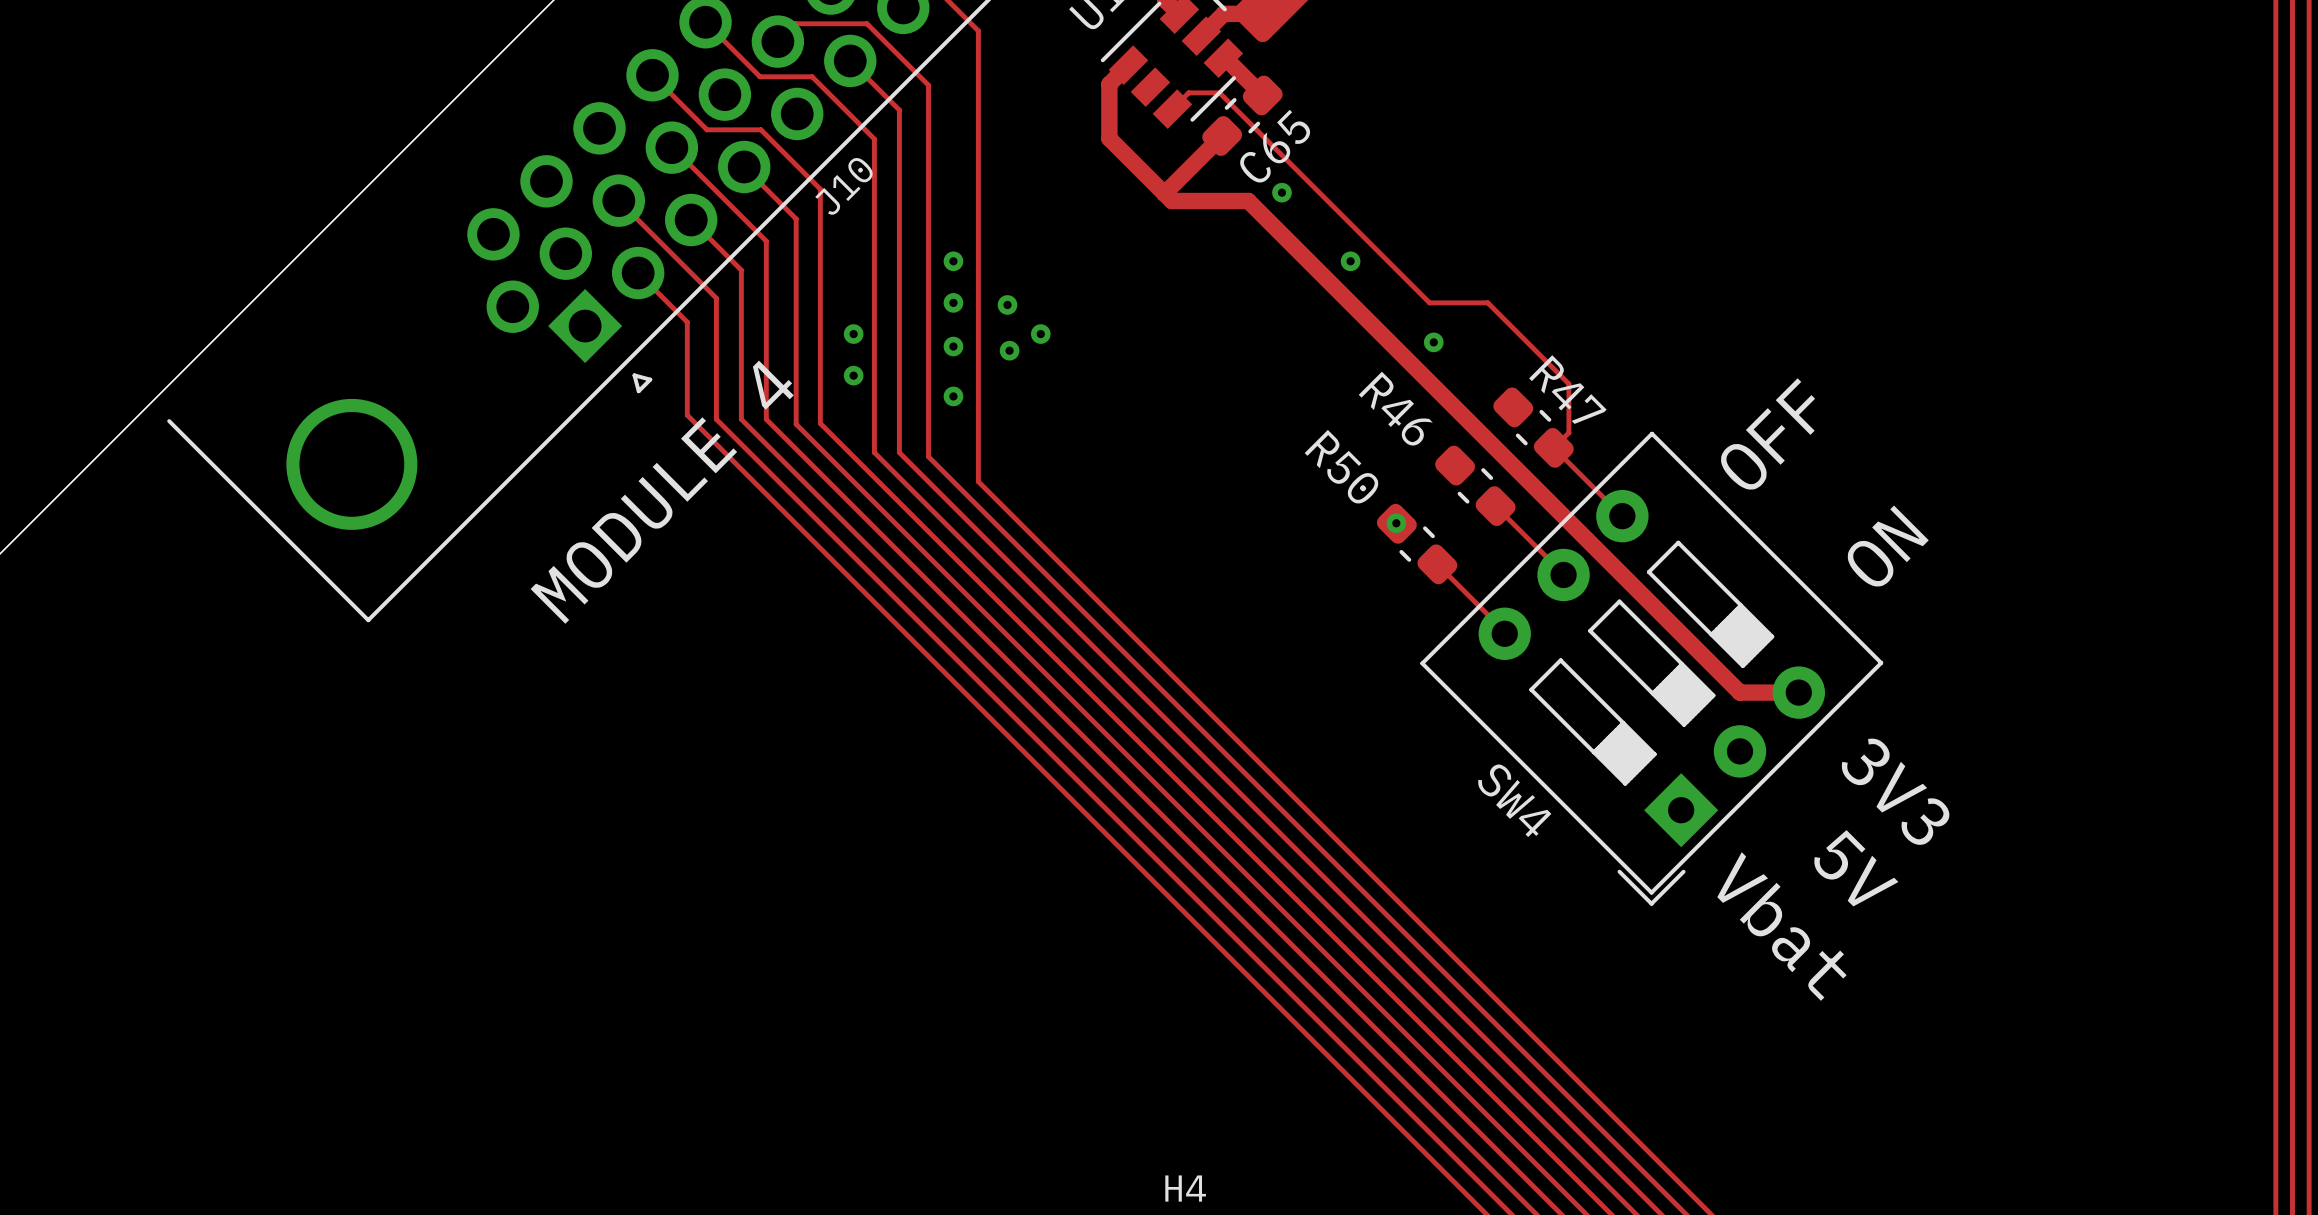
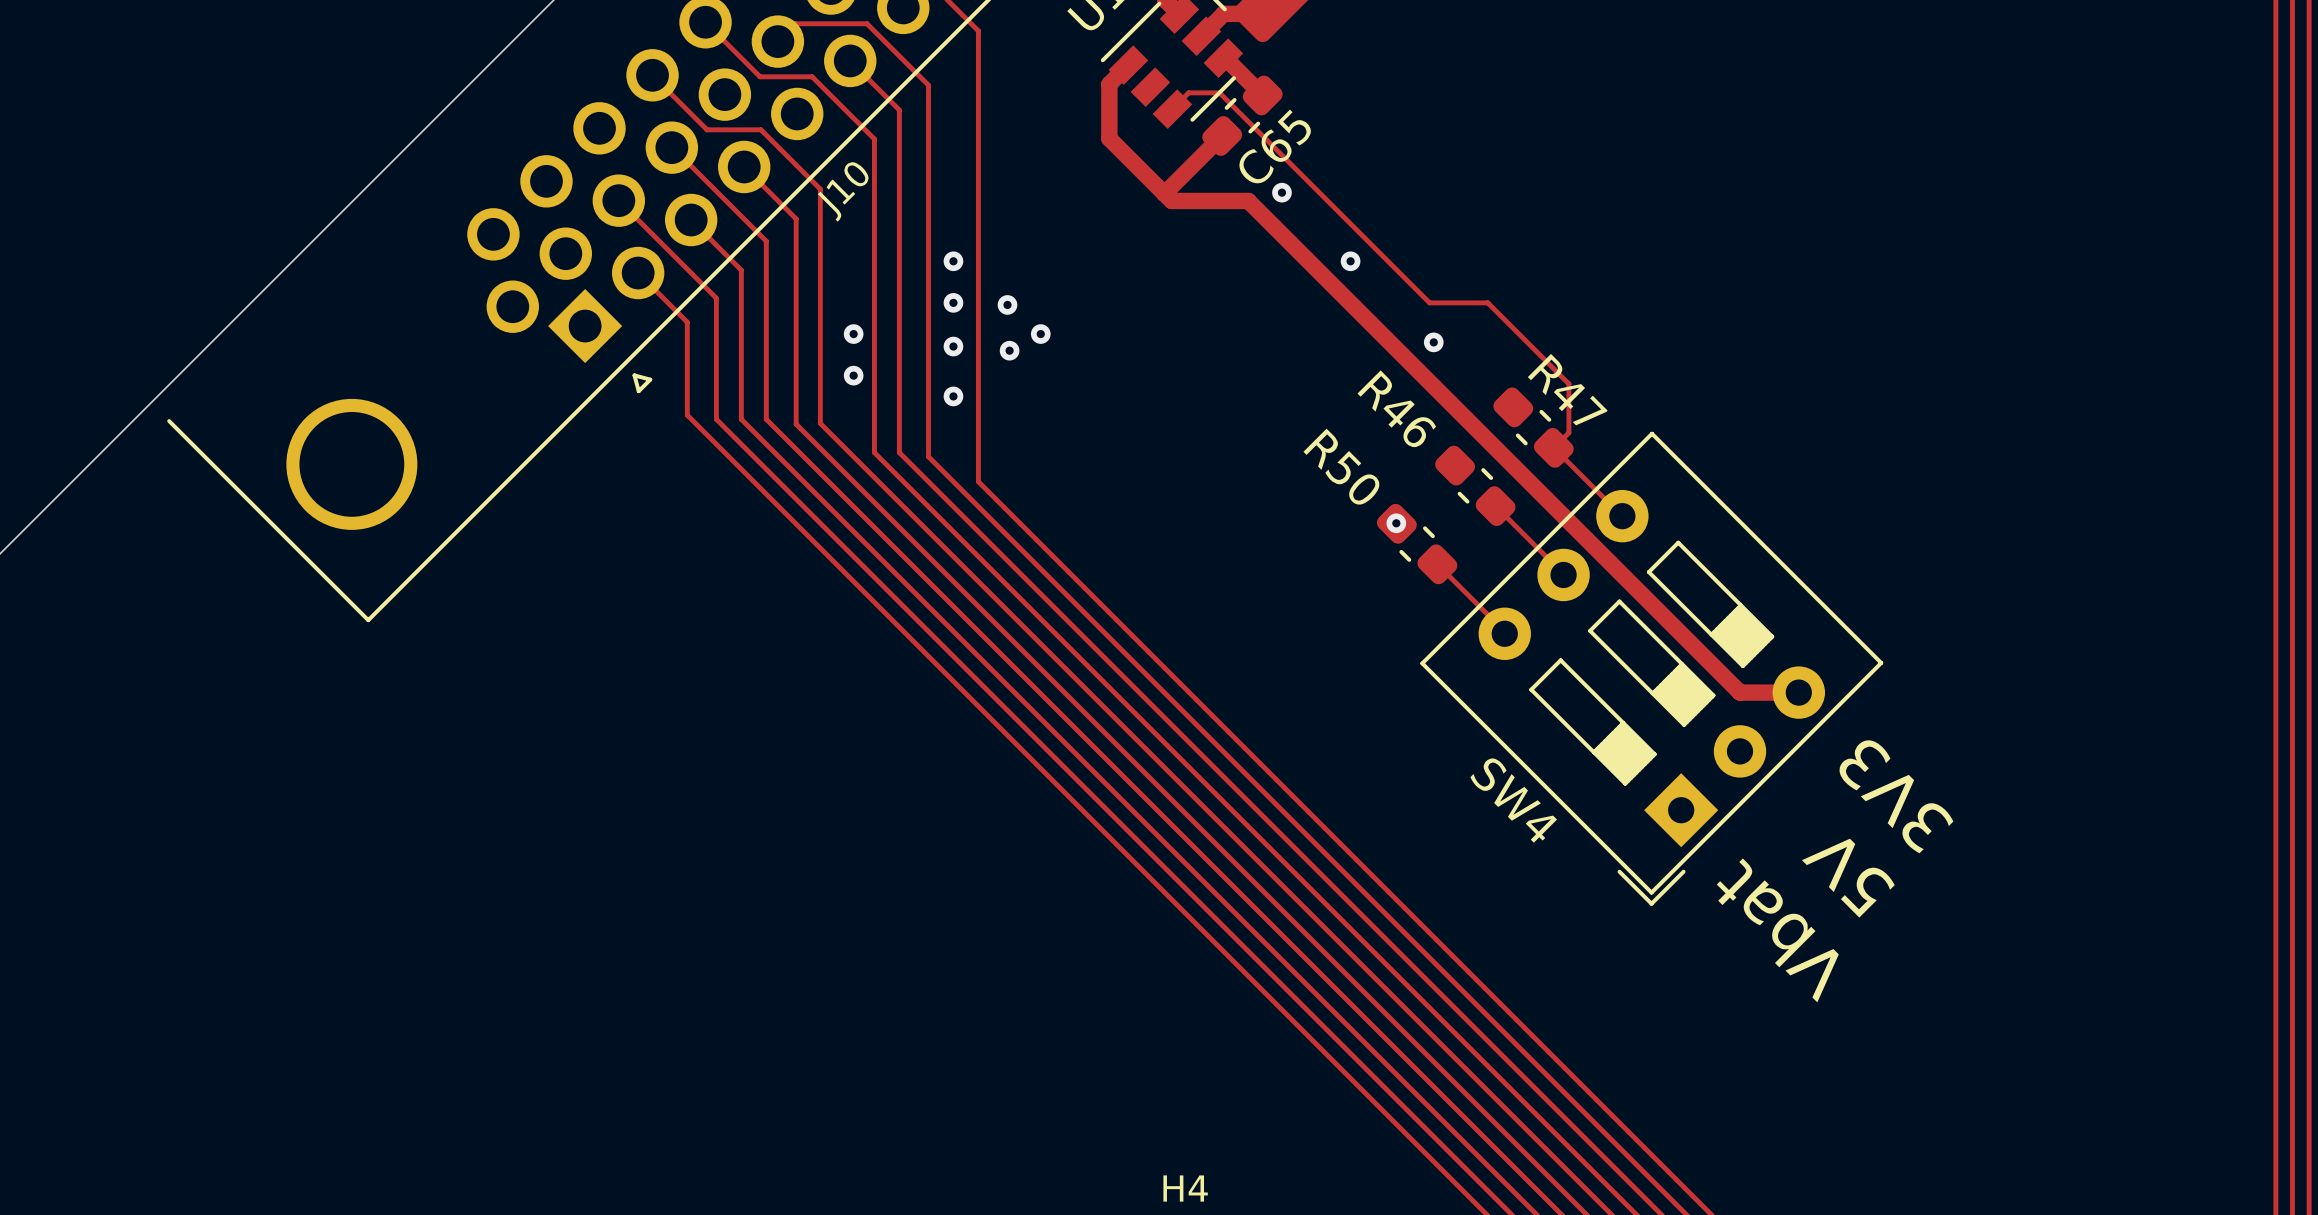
text: OFF (1767, 434) -> none
text: MODULE 4 (662, 492) -> none
text: ON (1888, 546) -> none
text rotation: 0° (1895, 791) -> 180° (1896, 796)
text rotation: 0° (1856, 868) -> 180° (1848, 878)
text rotation: 0° (1781, 926) -> 180° (1777, 930)

